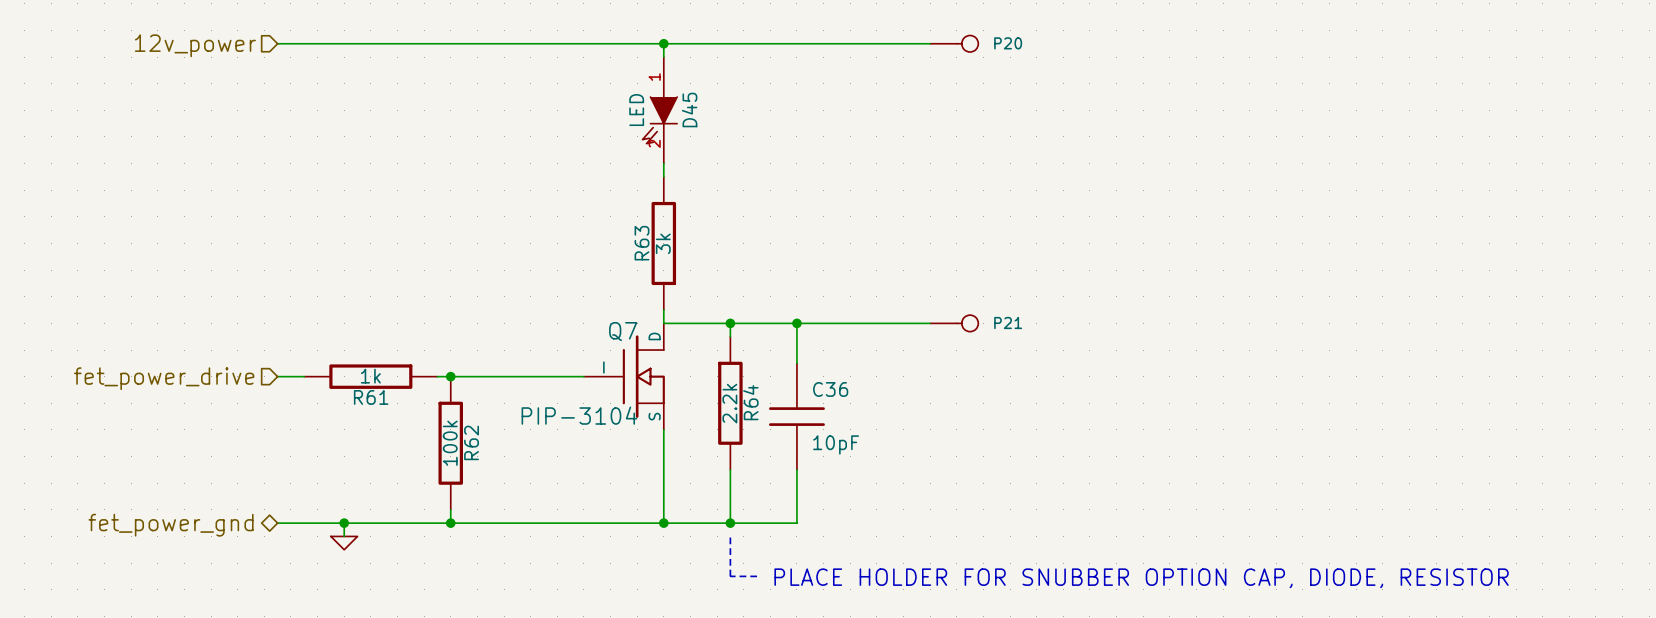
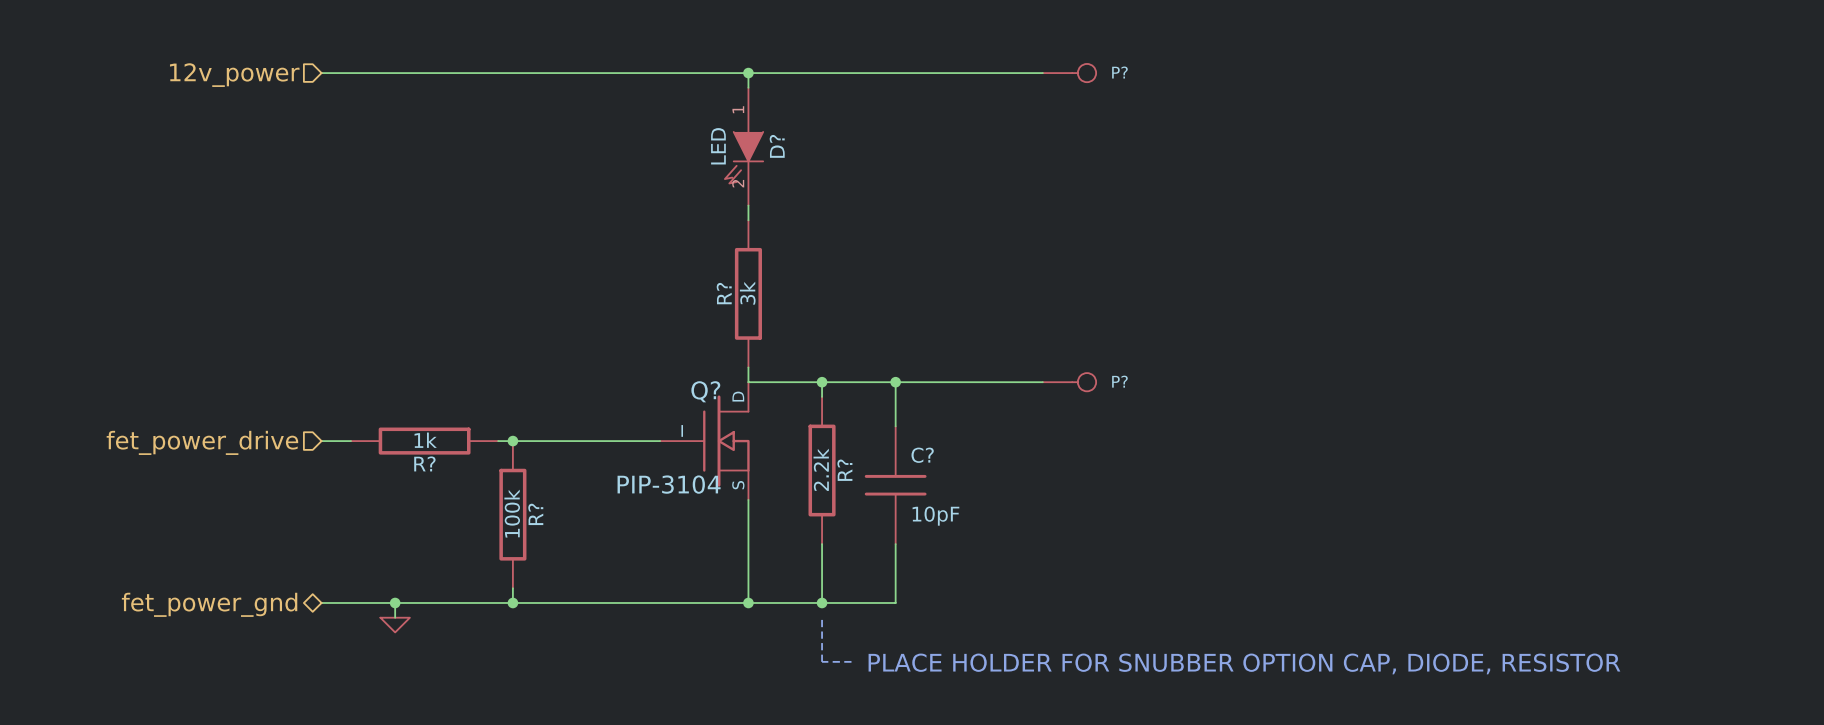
P20 name: P20 (1008, 43) -> P? (1119, 72)
D45 name: D45 (689, 110) -> D? (777, 146)
R63 name: R63 (641, 243) -> R? (724, 293)
P21 name: P21 (1008, 322) -> P? (1119, 381)
Q7 name: Q7 (623, 331) -> Q? (705, 391)
C36 name: C36 (830, 389) -> C? (922, 455)
R61 name: R61 (371, 397) -> R? (424, 463)
R64 name: R64 (750, 402) -> R? (844, 470)
R62 name: R62 (471, 442) -> R? (535, 514)

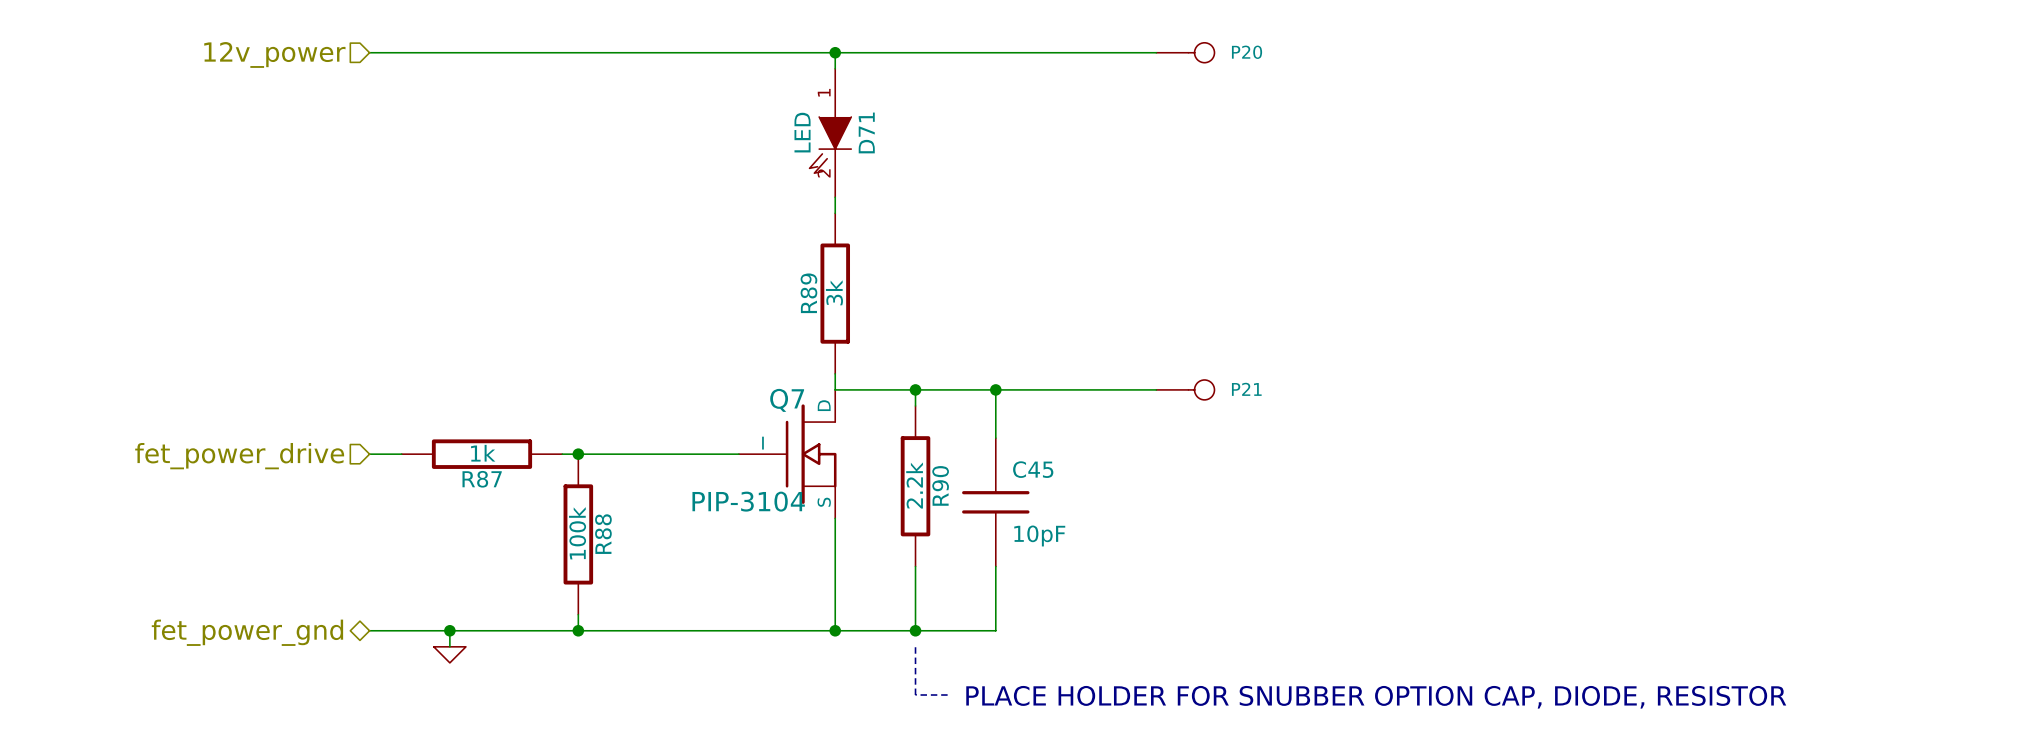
P? name: P? (1119, 72) -> P20 (1247, 52)
D? name: D? (777, 146) -> D71 (866, 132)
R? name: R? (724, 293) -> R89 (808, 293)
P? name: P? (1119, 381) -> P21 (1246, 389)
Q? name: Q? (705, 391) -> Q7 (787, 400)
C? name: C? (922, 455) -> C45 (1033, 469)
R? name: R? (424, 463) -> R87 (482, 479)
R? name: R? (844, 470) -> R90 (940, 485)
R? name: R? (535, 514) -> R88 (603, 534)

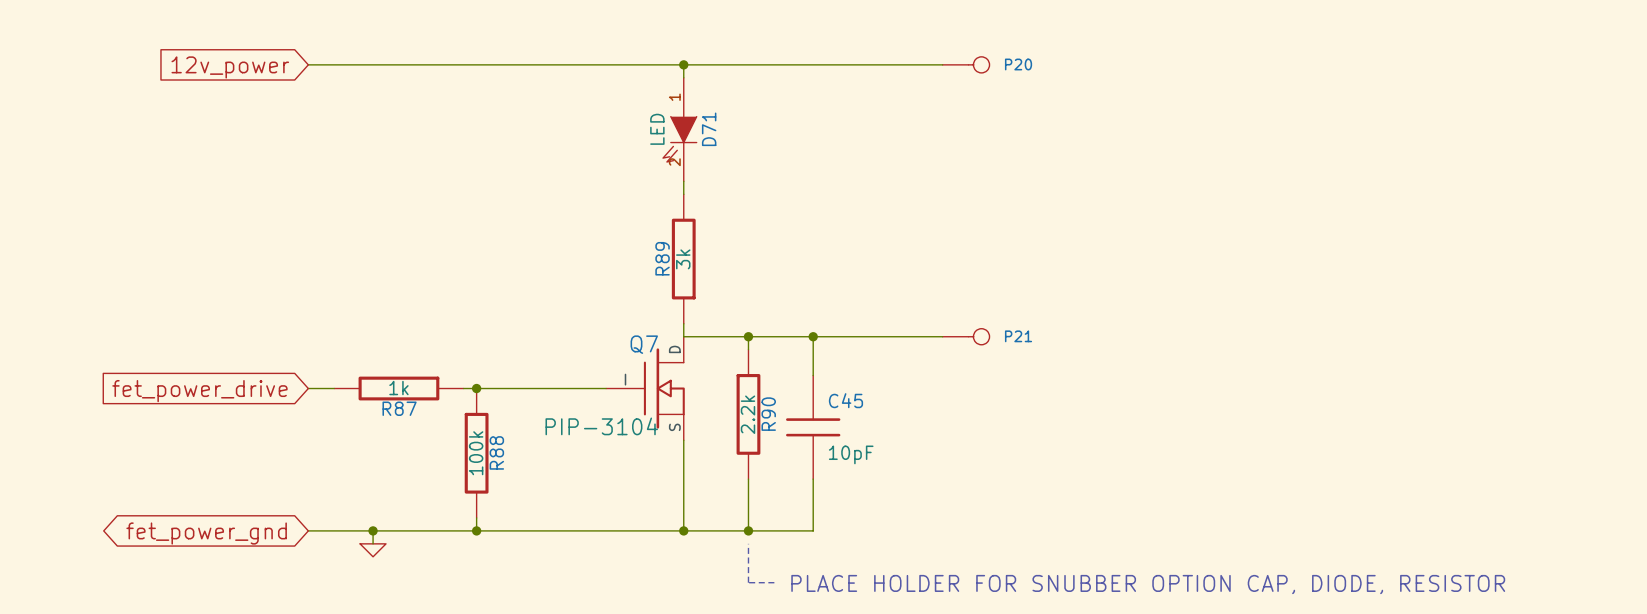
hierarchical label: 12v_power (274, 54) -> none
global label: none -> 12v_power (230, 67)
hierarchical label: fet_power_drive (239, 456) -> none
global label: none -> fet_power_drive (199, 391)
hierarchical label: fet_power_gnd (247, 632) -> none
global label: none -> fet_power_gnd (206, 533)

